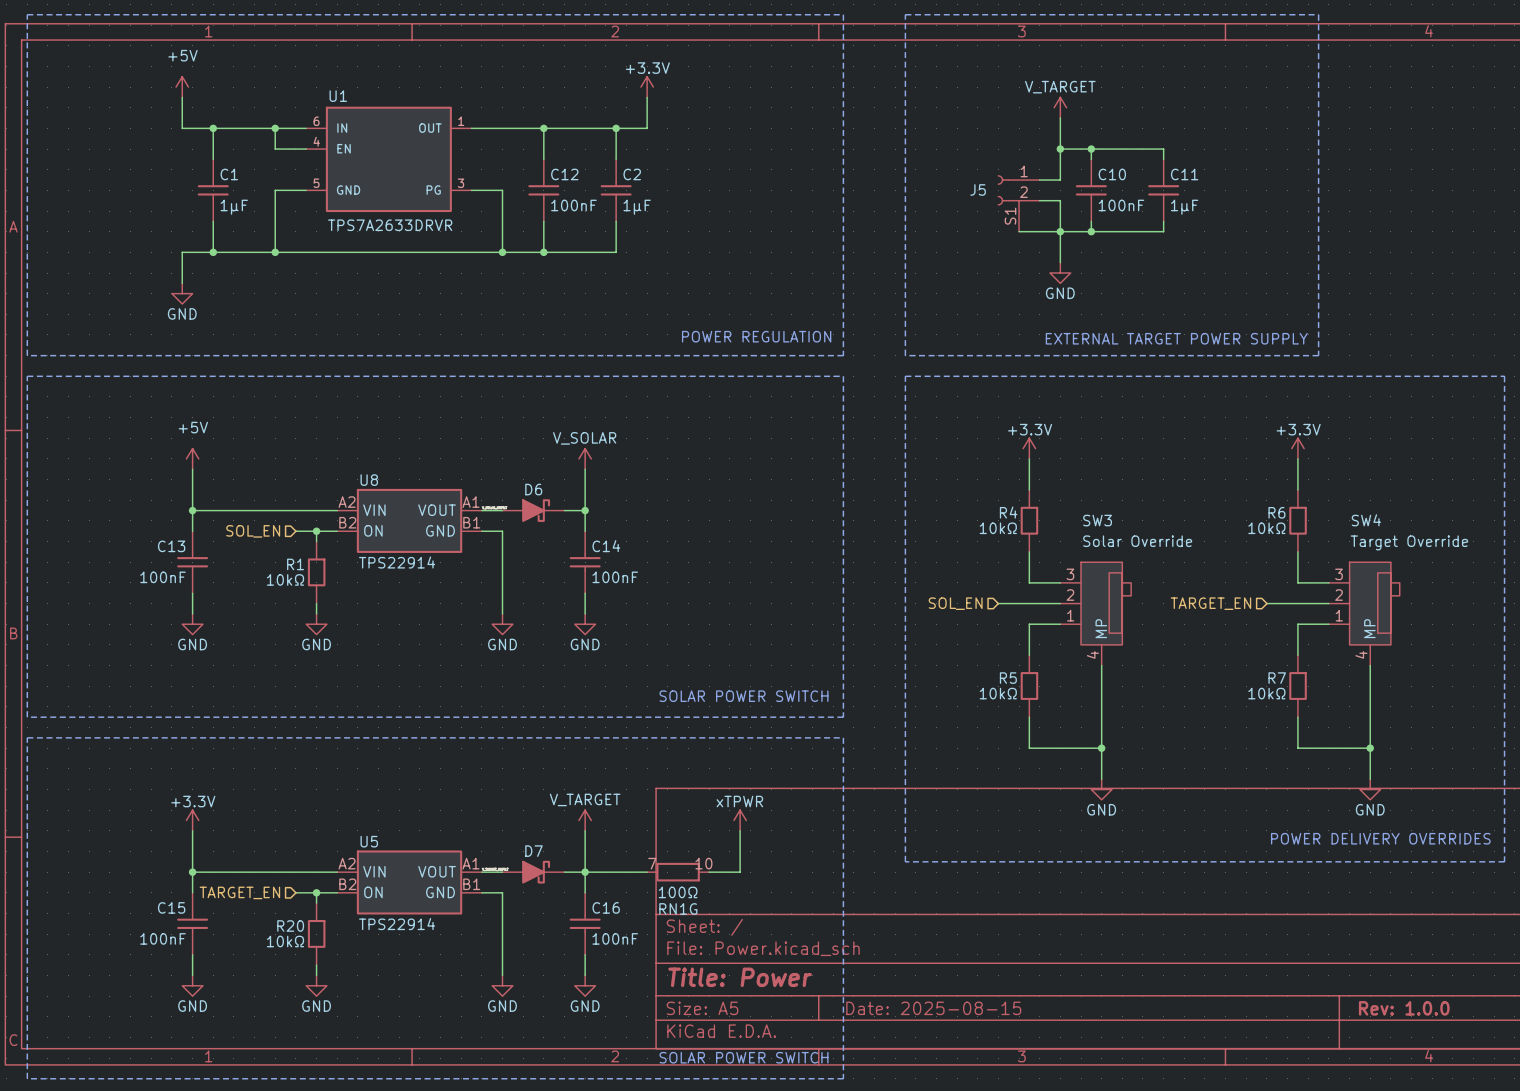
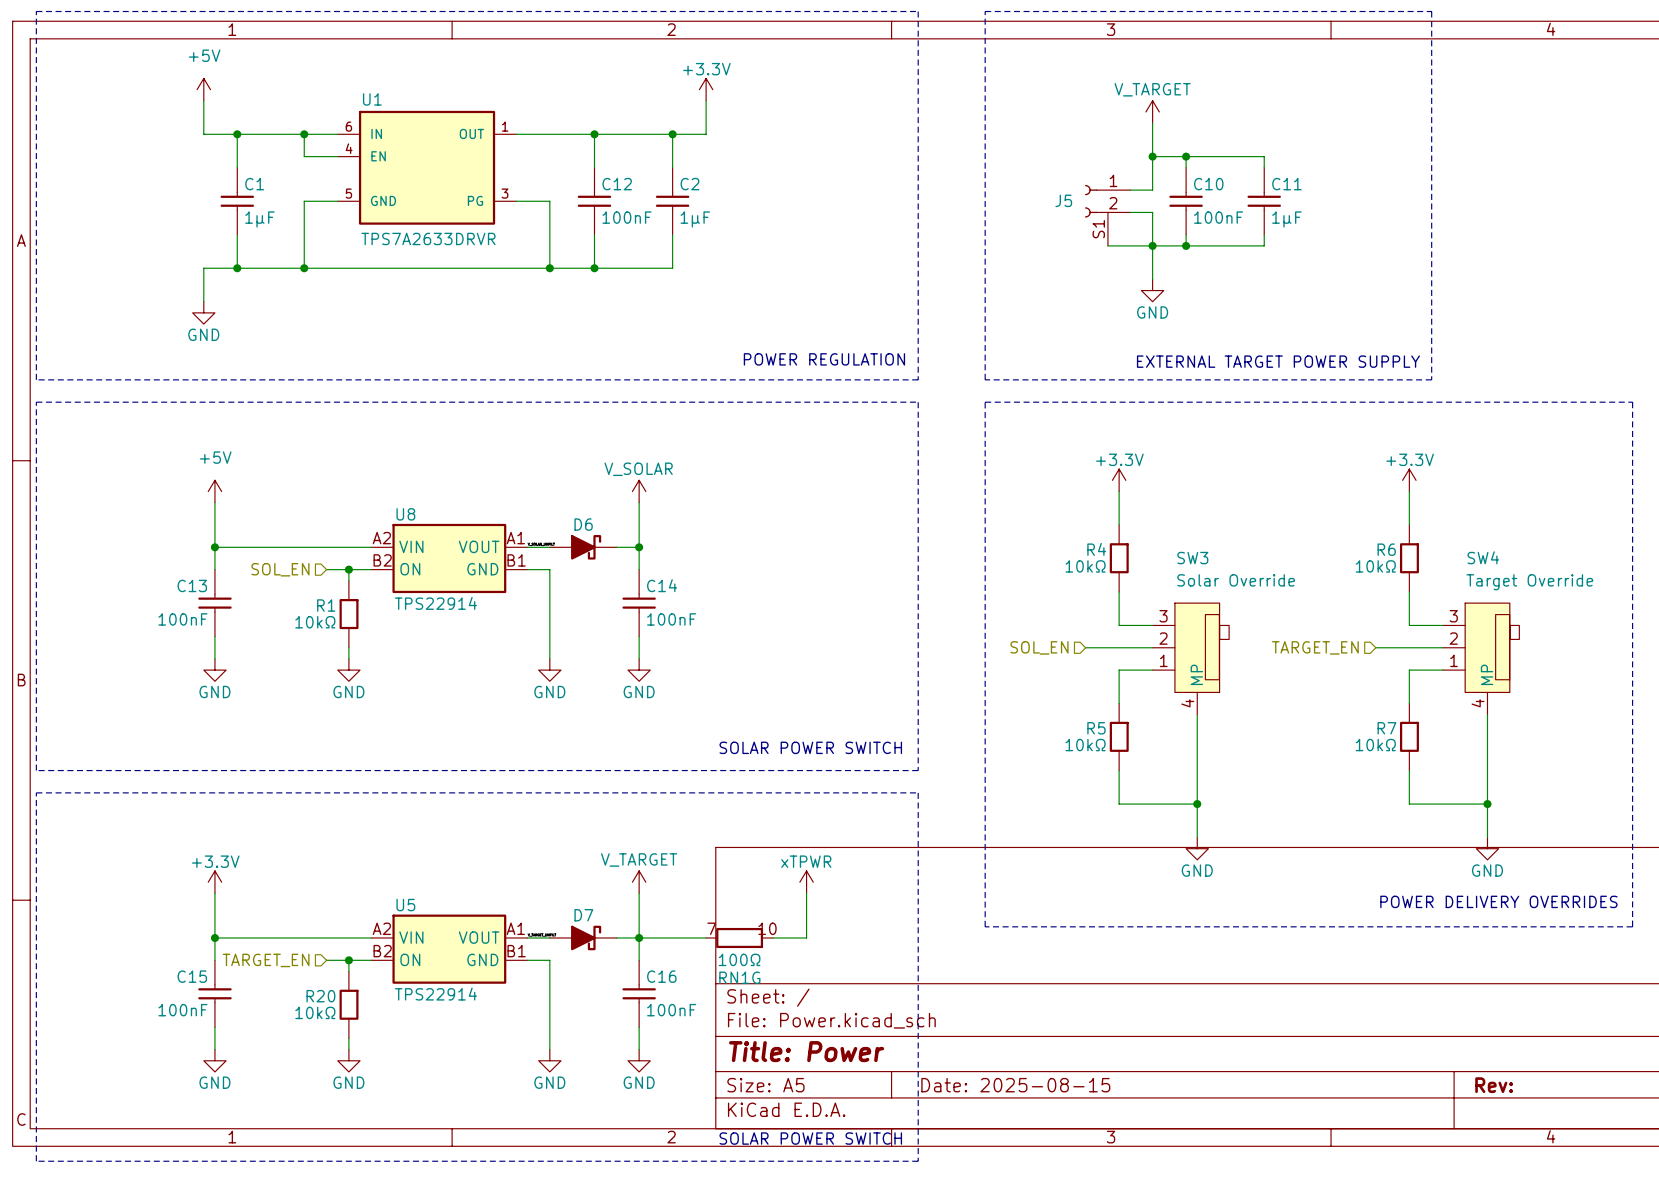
title block: Rev: 1.0.0 (1404, 1008) -> Rev: (1494, 1085)

